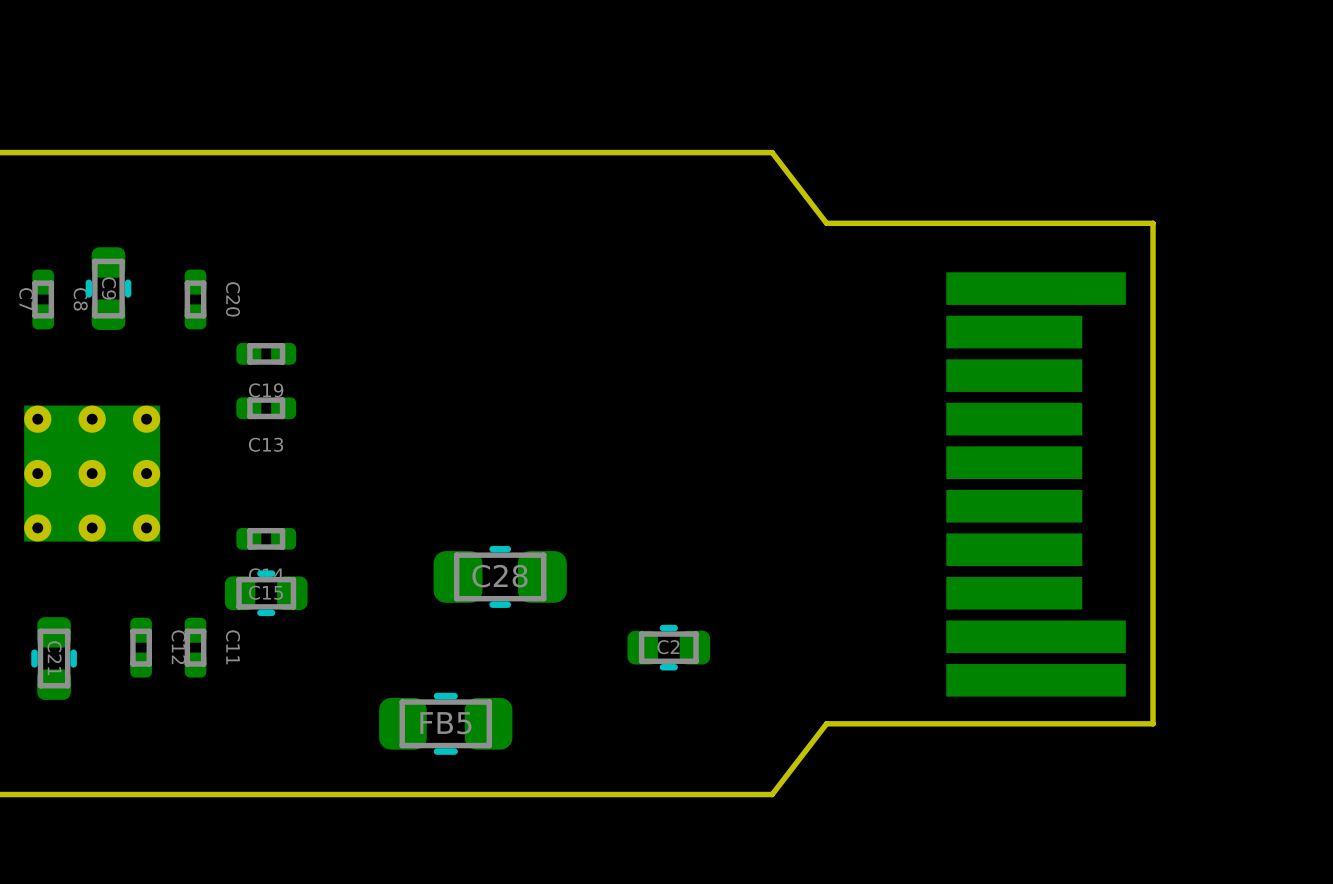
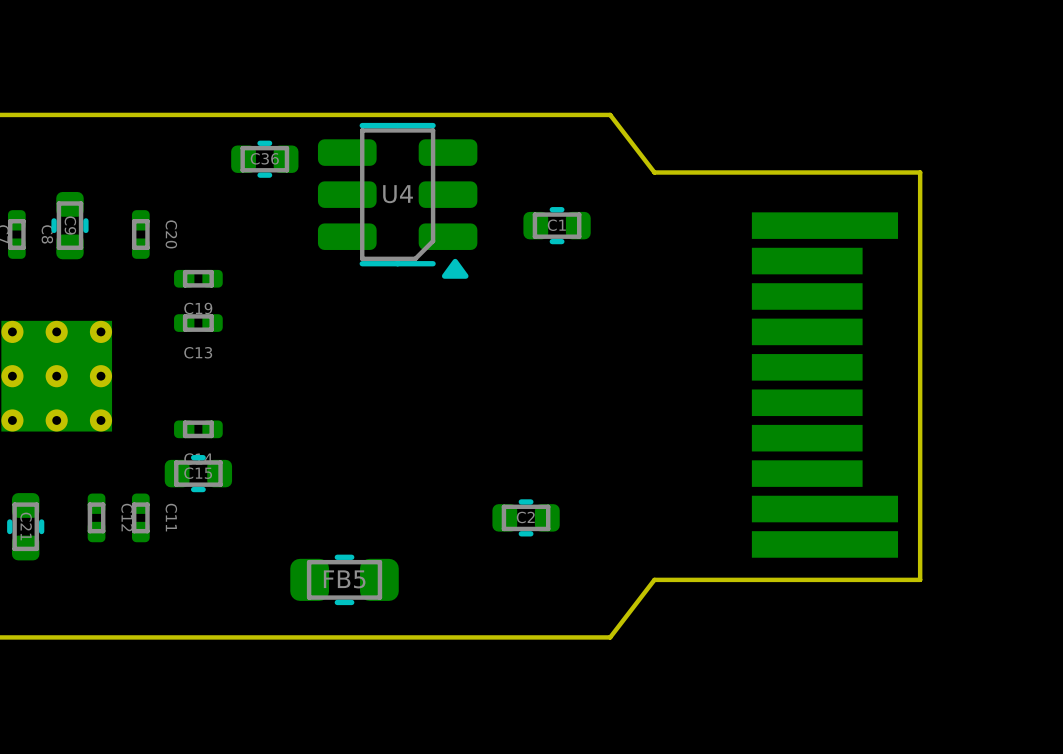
C36: none -> (264, 159)
U4: none -> (397, 200)
C1: none -> (557, 225)
C28: (500, 576) -> none

